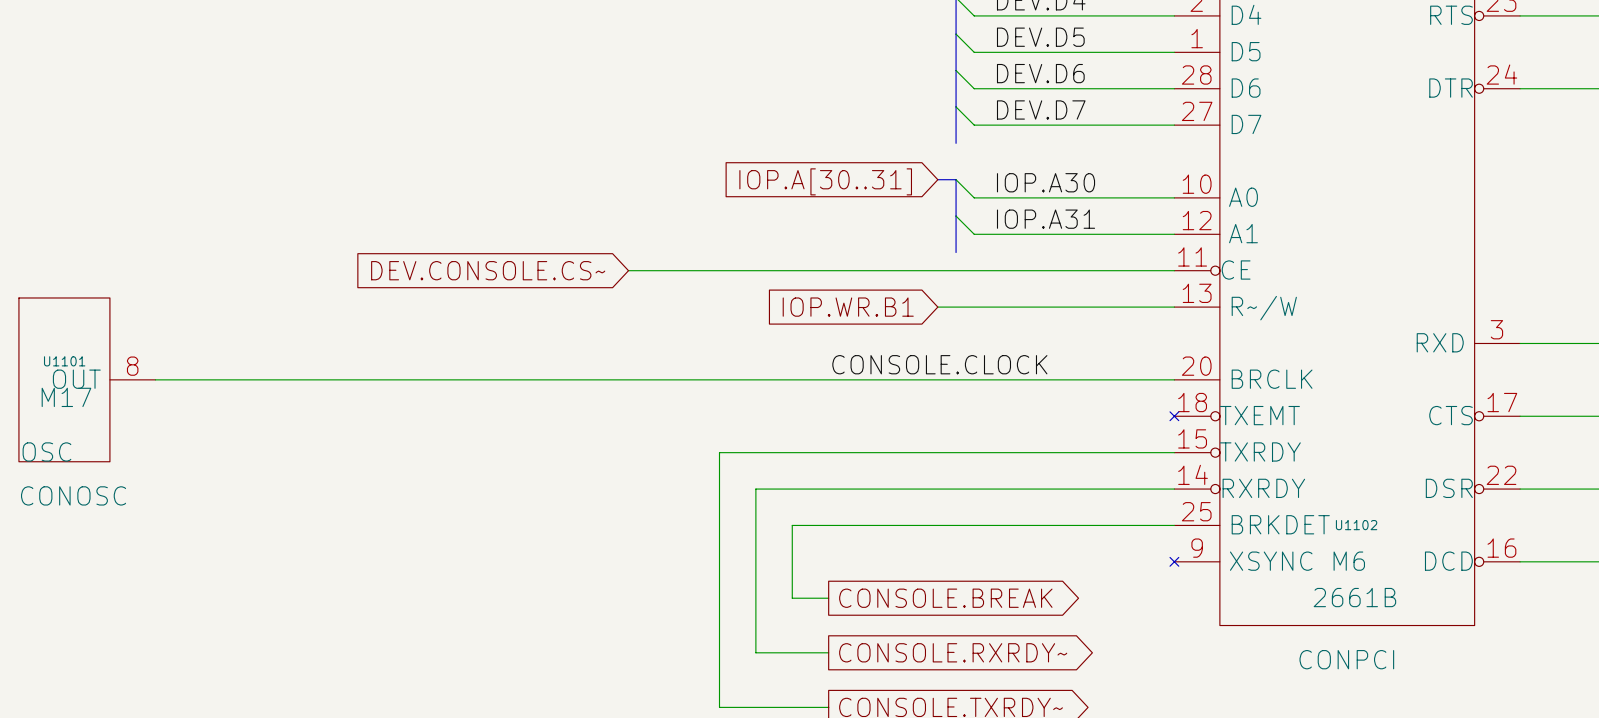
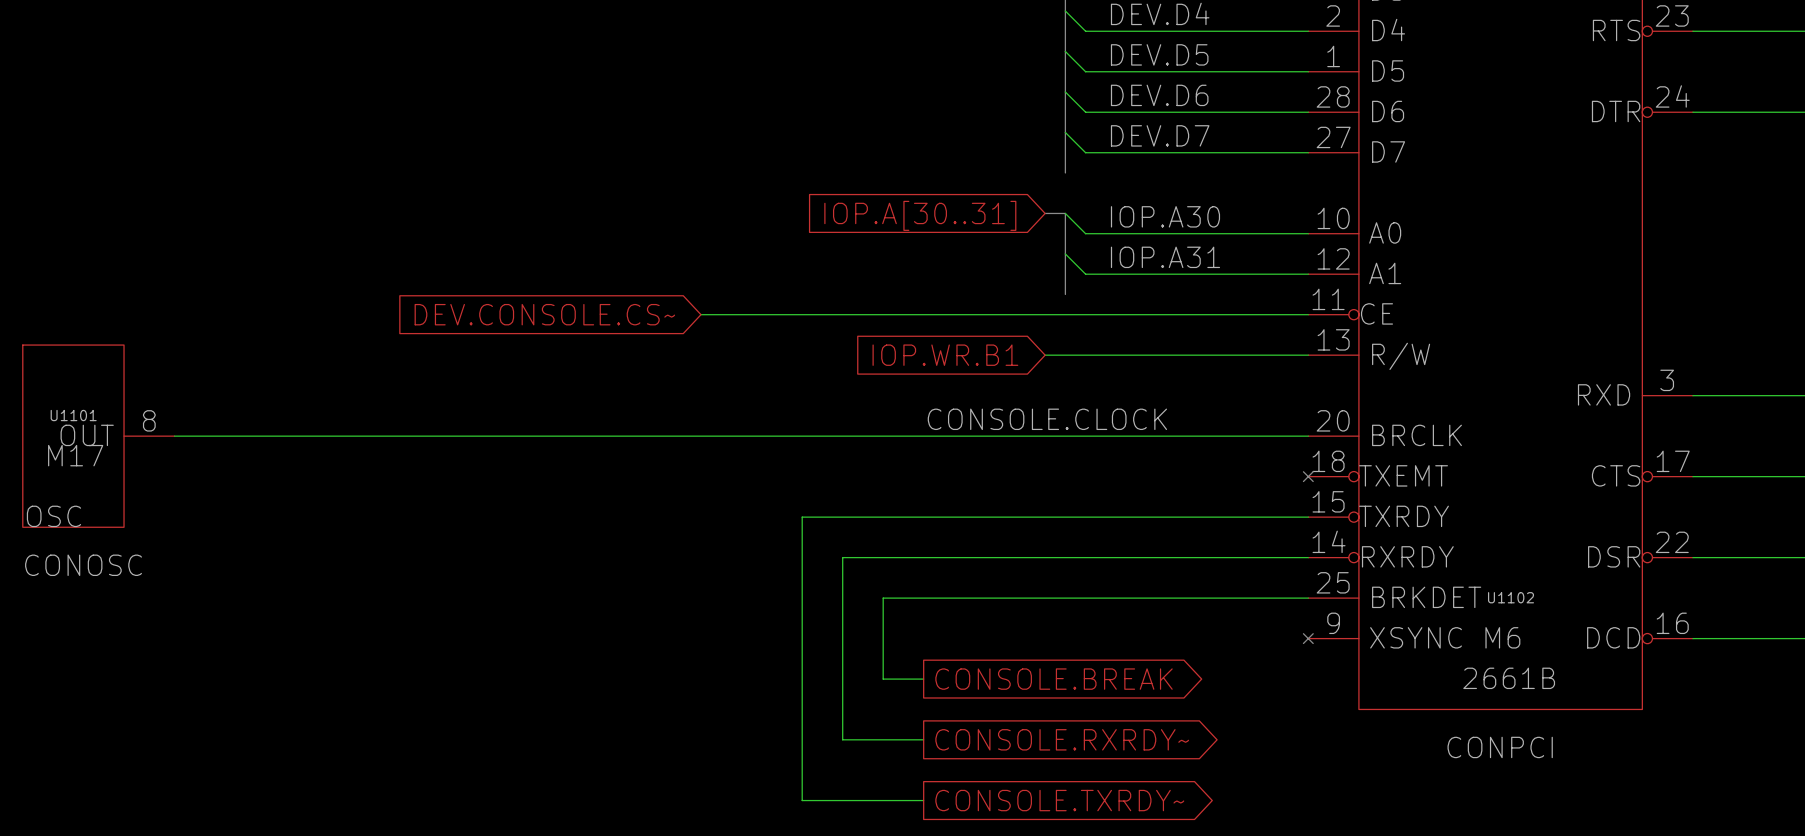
U1102 pin name: R~/W (1264, 308) -> R/W (1401, 356)

